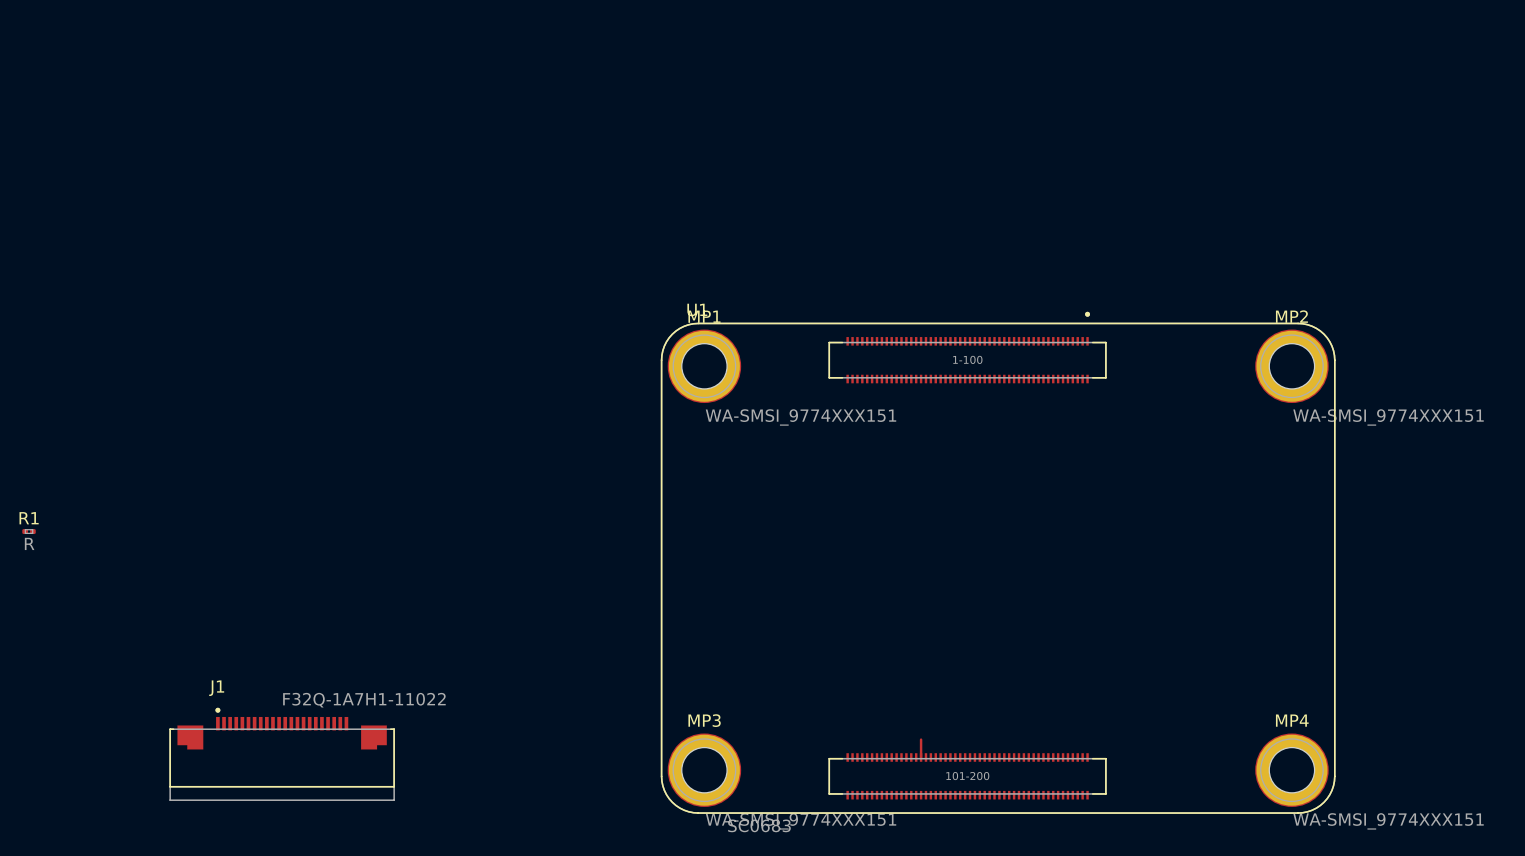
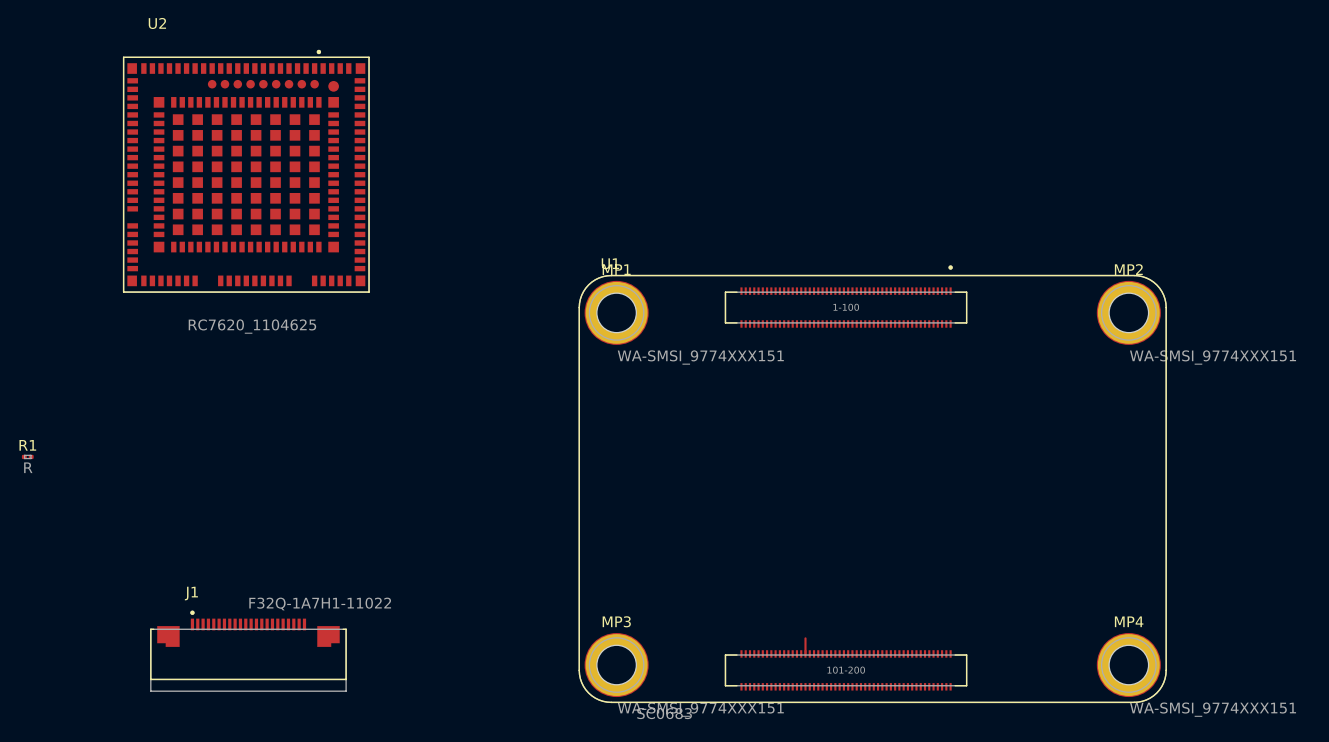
U2: none -> RC7620_1104625 (246, 171)

